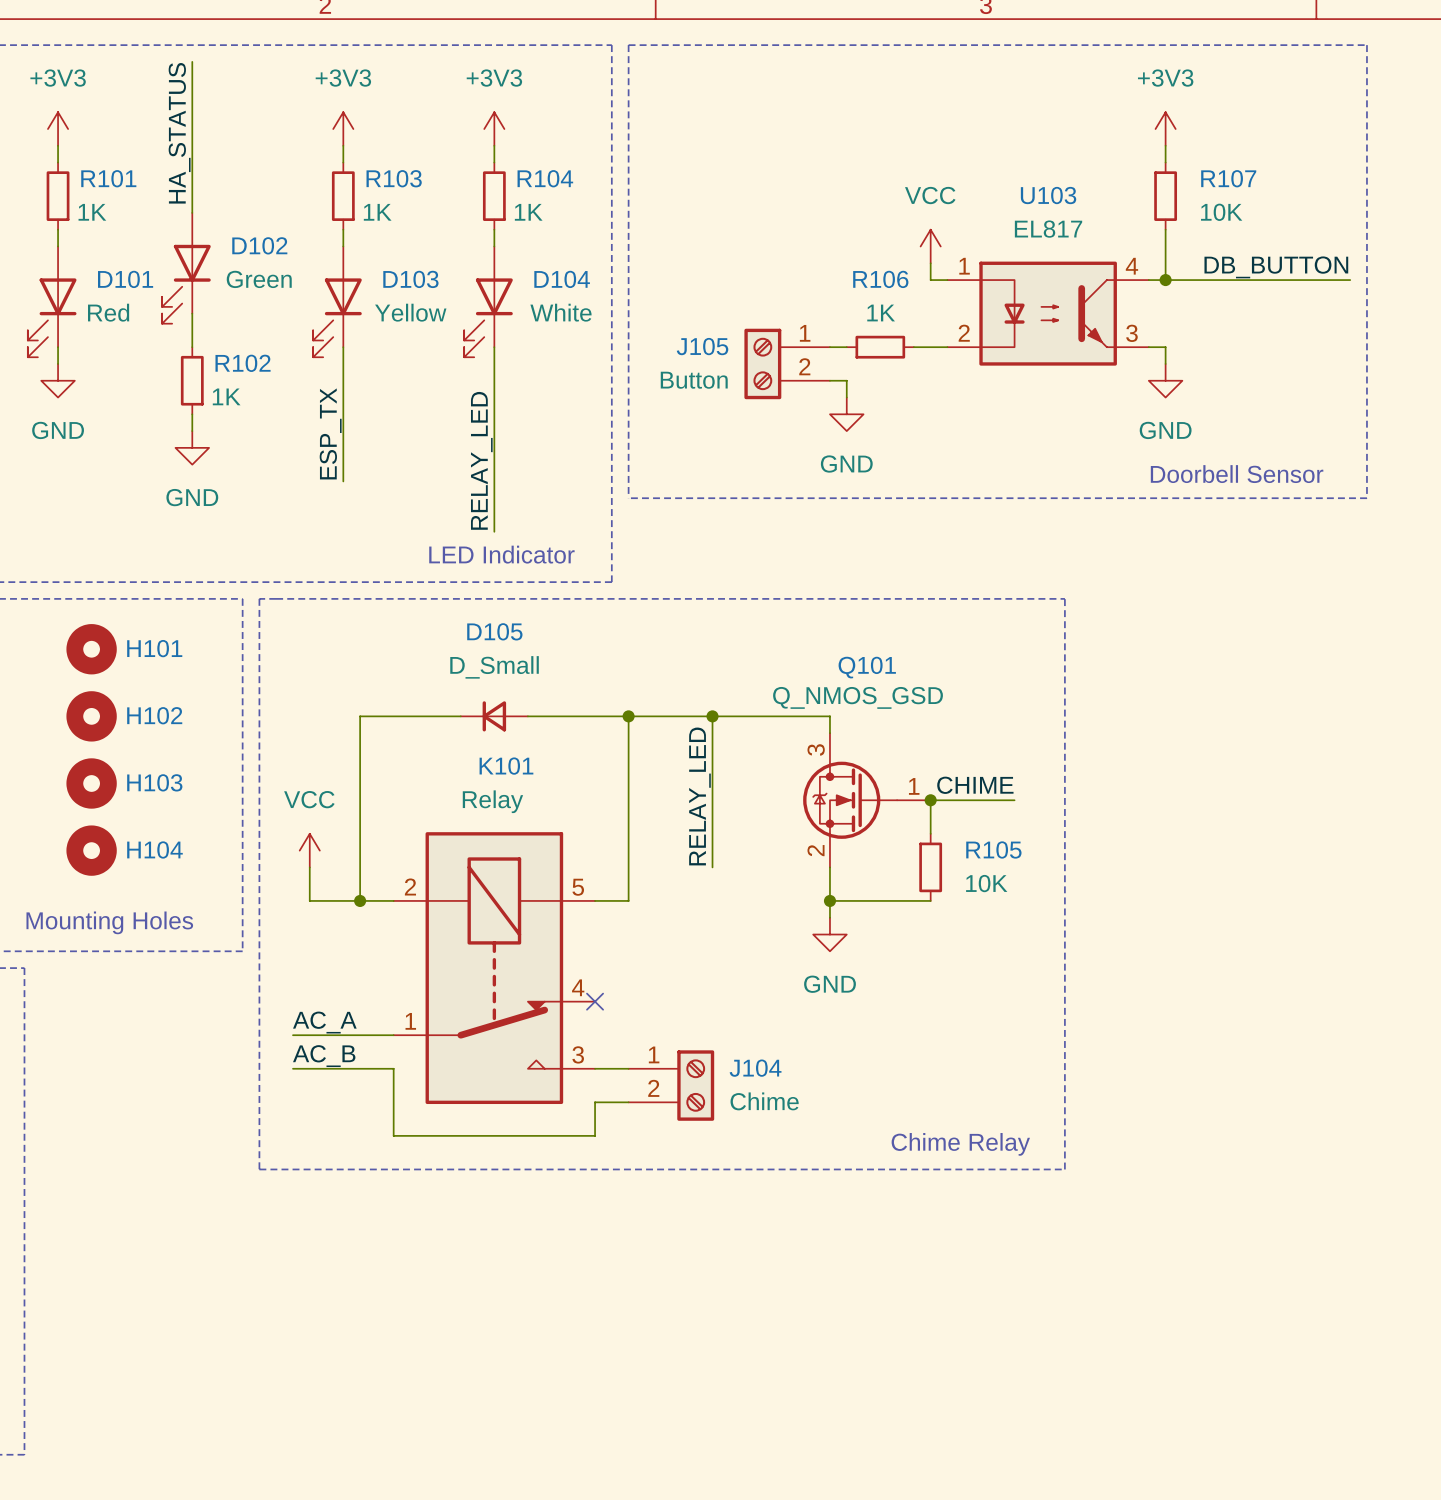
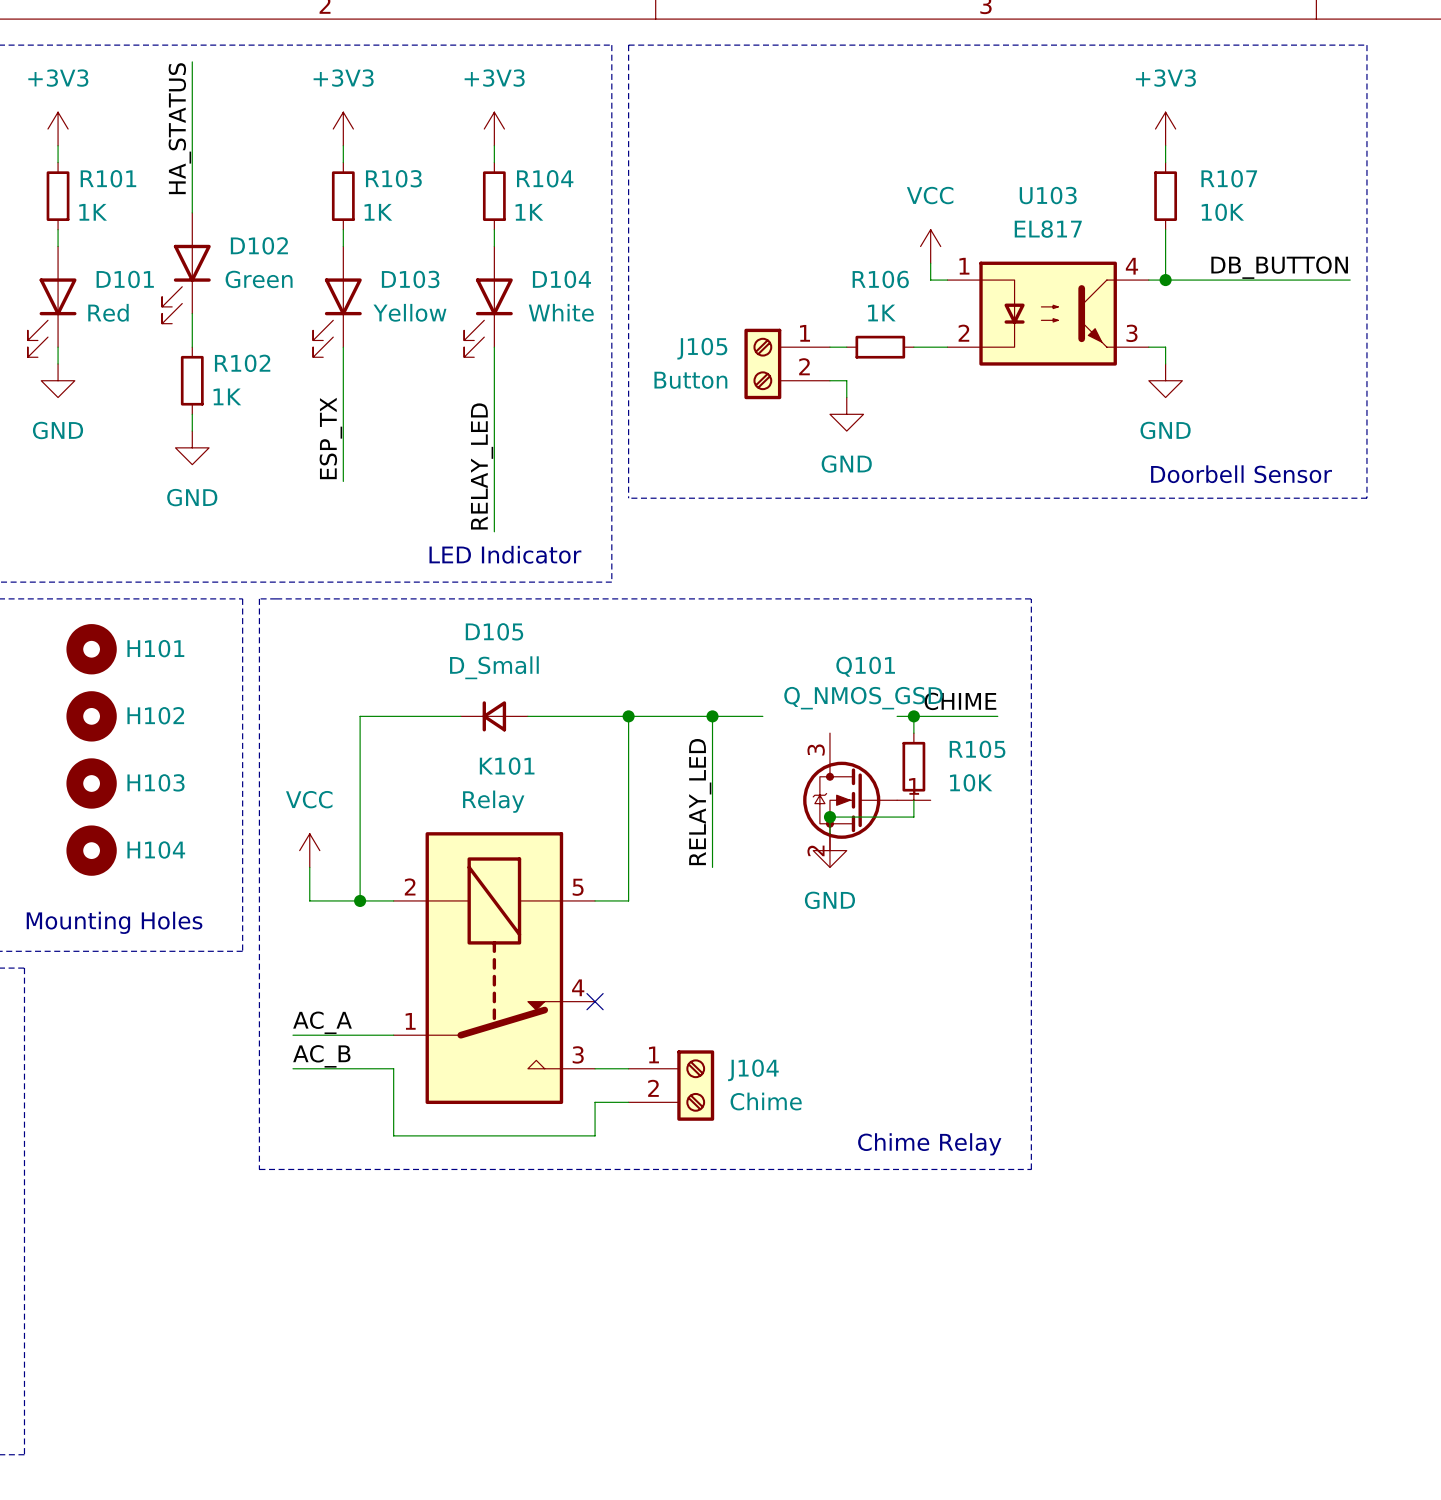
line: (1031, 598) (1064, 598) (1064, 1169) (1031, 1169) -> (1031, 598) (1031, 1169)
wire: (762, 716) (829, 716) (829, 733) -> none
wire: none -> (913, 716) (913, 733)
junction: none -> (913, 716)
label position: CHIME (975, 785) -> CHIME (960, 701)
wire: none -> (913, 800) (913, 817) (829, 817) (829, 833)
junction: (930, 800) -> none
wire: (1014, 800) (930, 800) (930, 833) -> none
junction: none -> (829, 817)
wire: (829, 867) (829, 917) -> none
R105 position: (930, 867) -> (913, 766)
wire: (829, 900) (930, 900) -> (897, 716) (997, 716)
junction: (829, 900) -> none
power symbol position: GND (829, 934) -> GND (829, 850)
text position: Chime Relay (960, 1144) -> Chime Relay (929, 1144)

